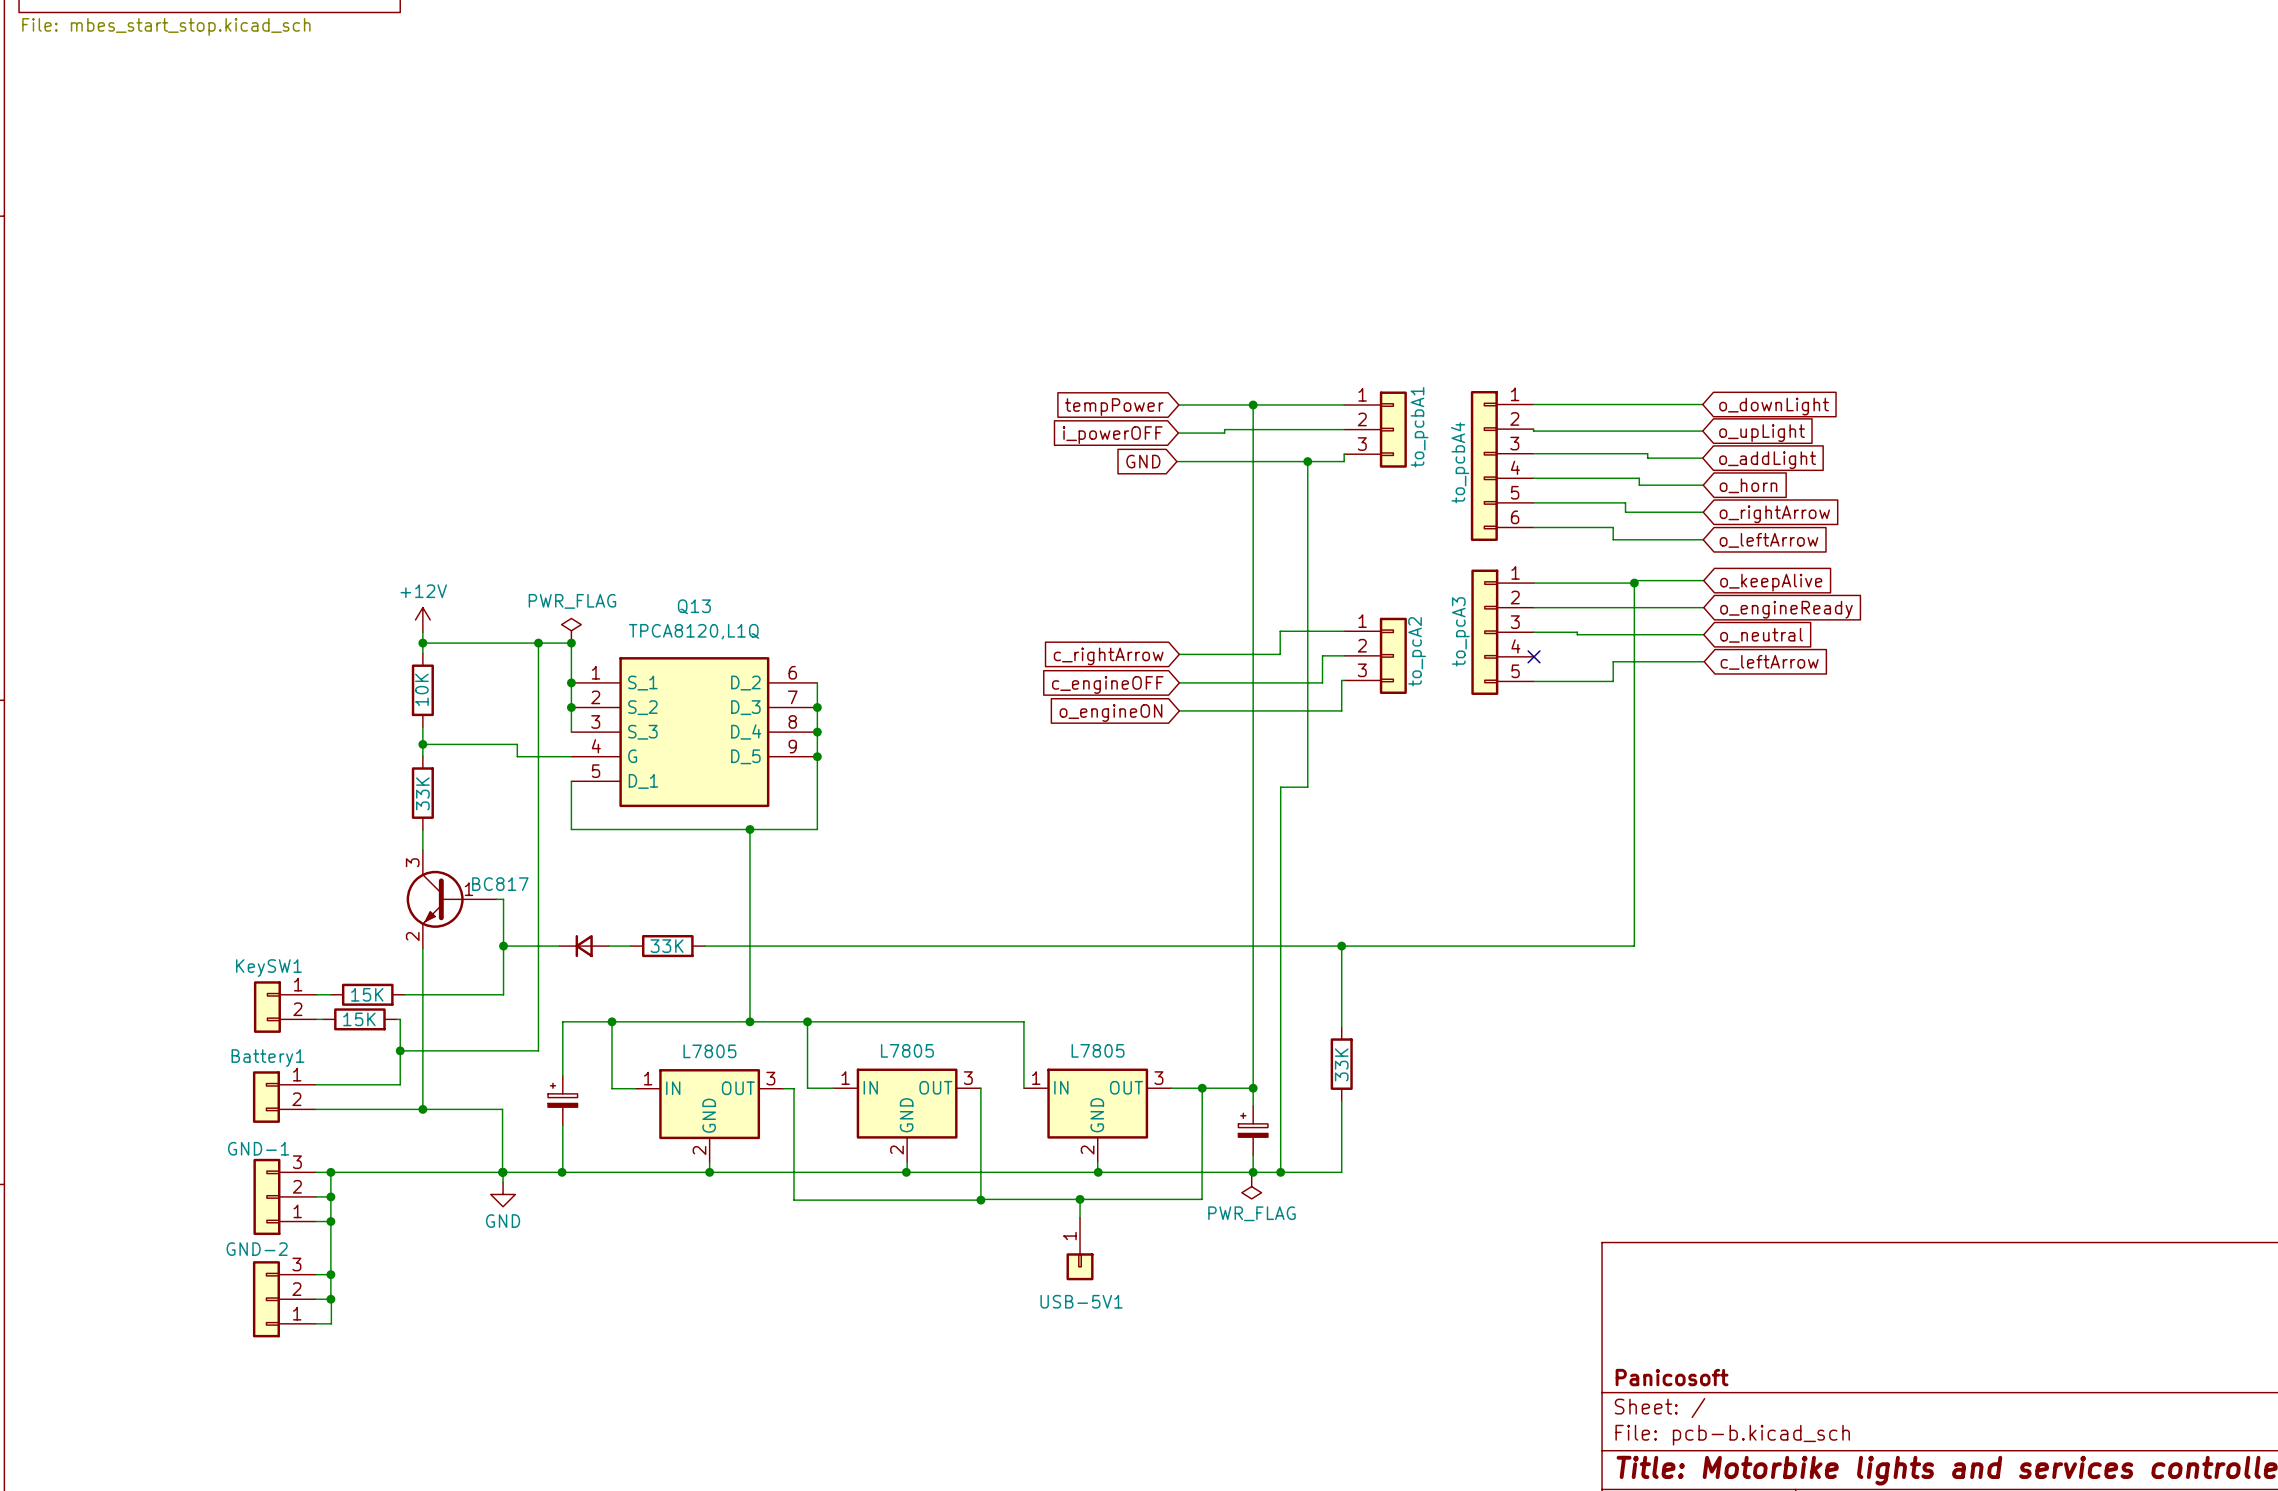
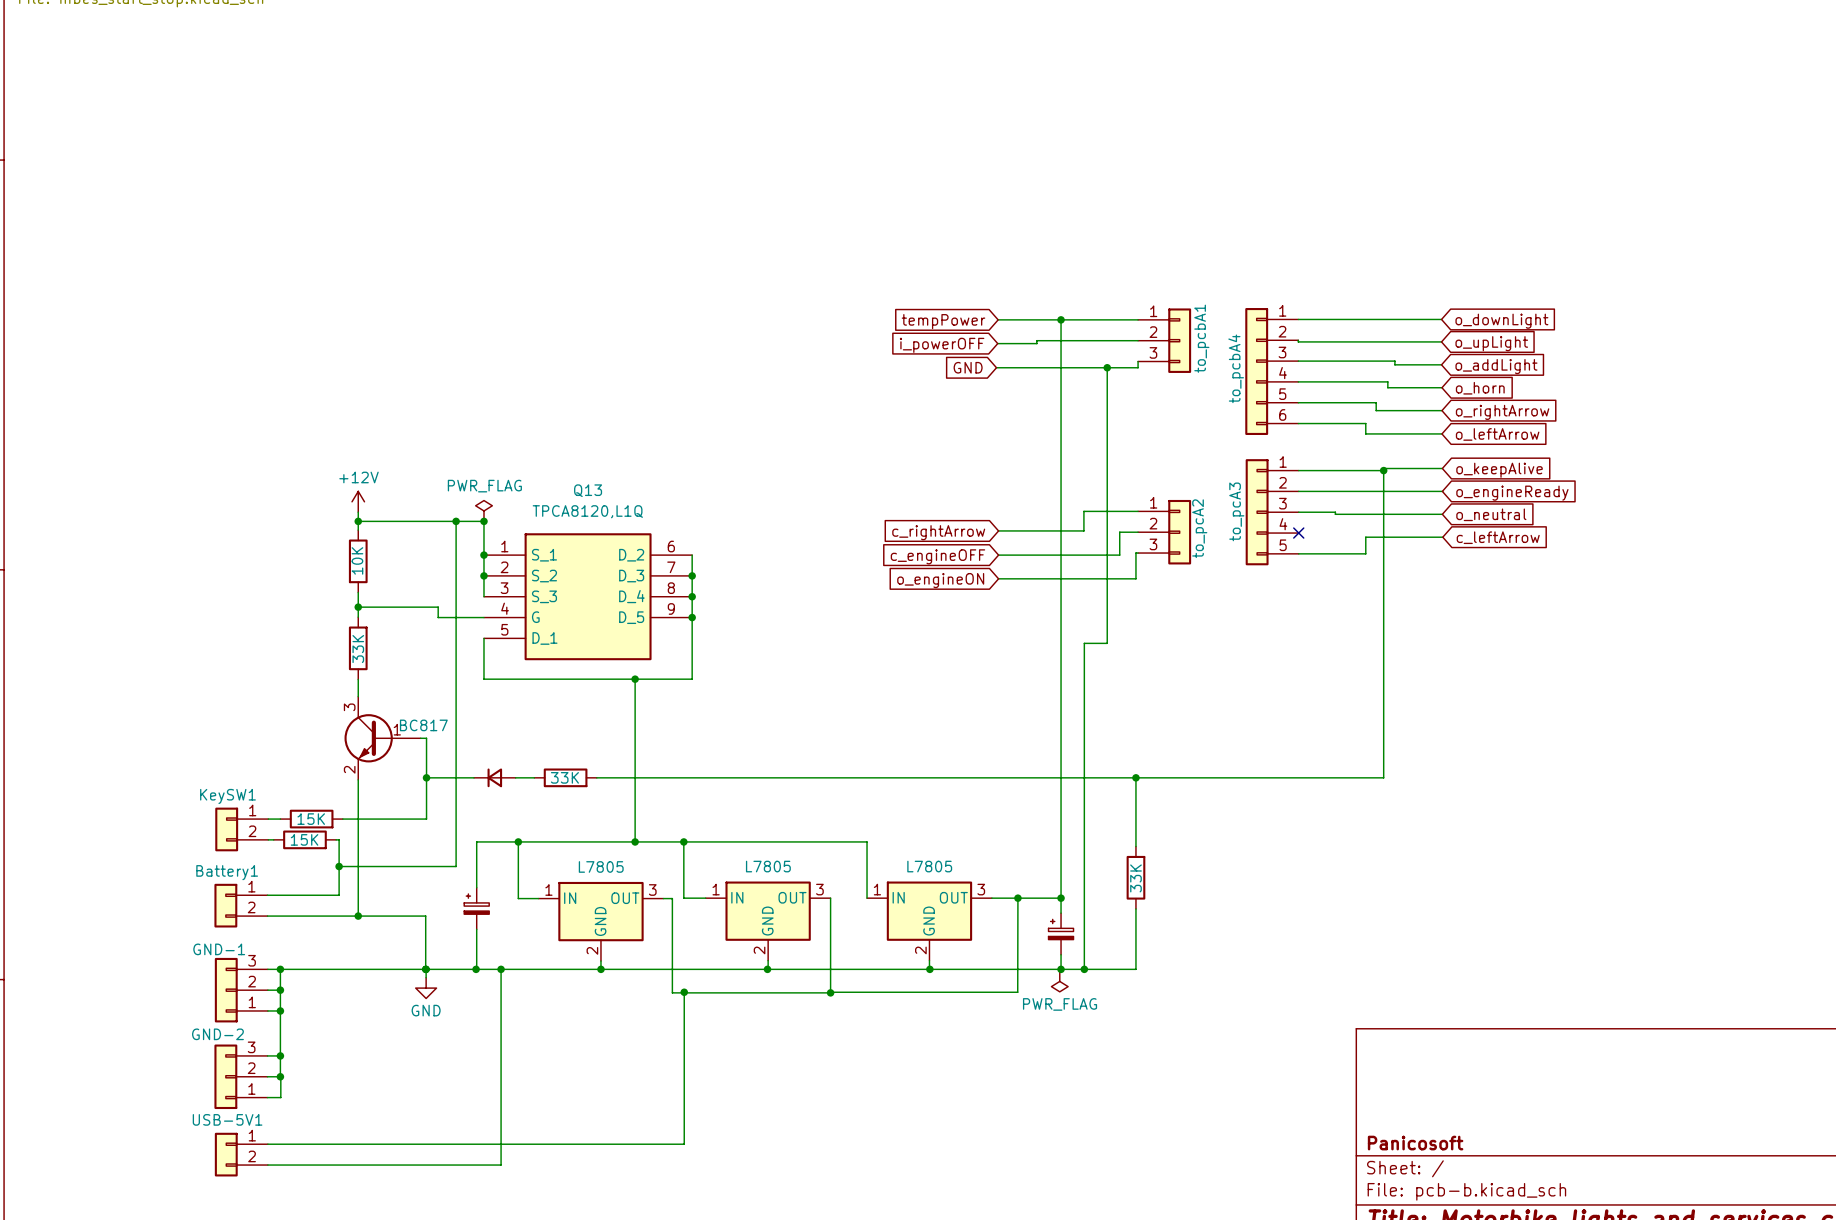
wire: none -> (501, 969) (501, 1165) (267, 1165)
junction: none -> (501, 969)
wire: none -> (684, 992) (684, 1144) (267, 1144)
junction: none -> (684, 992)
wire: (1080, 1199) (1080, 1217) -> none
junction: (1080, 1199) -> none
USB-5V1 symbol: [1066, 1217, 1094, 1281] -> [214, 1132, 268, 1177]
USB-5V1 name position: USB-5V1 (1081, 1301) -> USB-5V1 (227, 1119)

